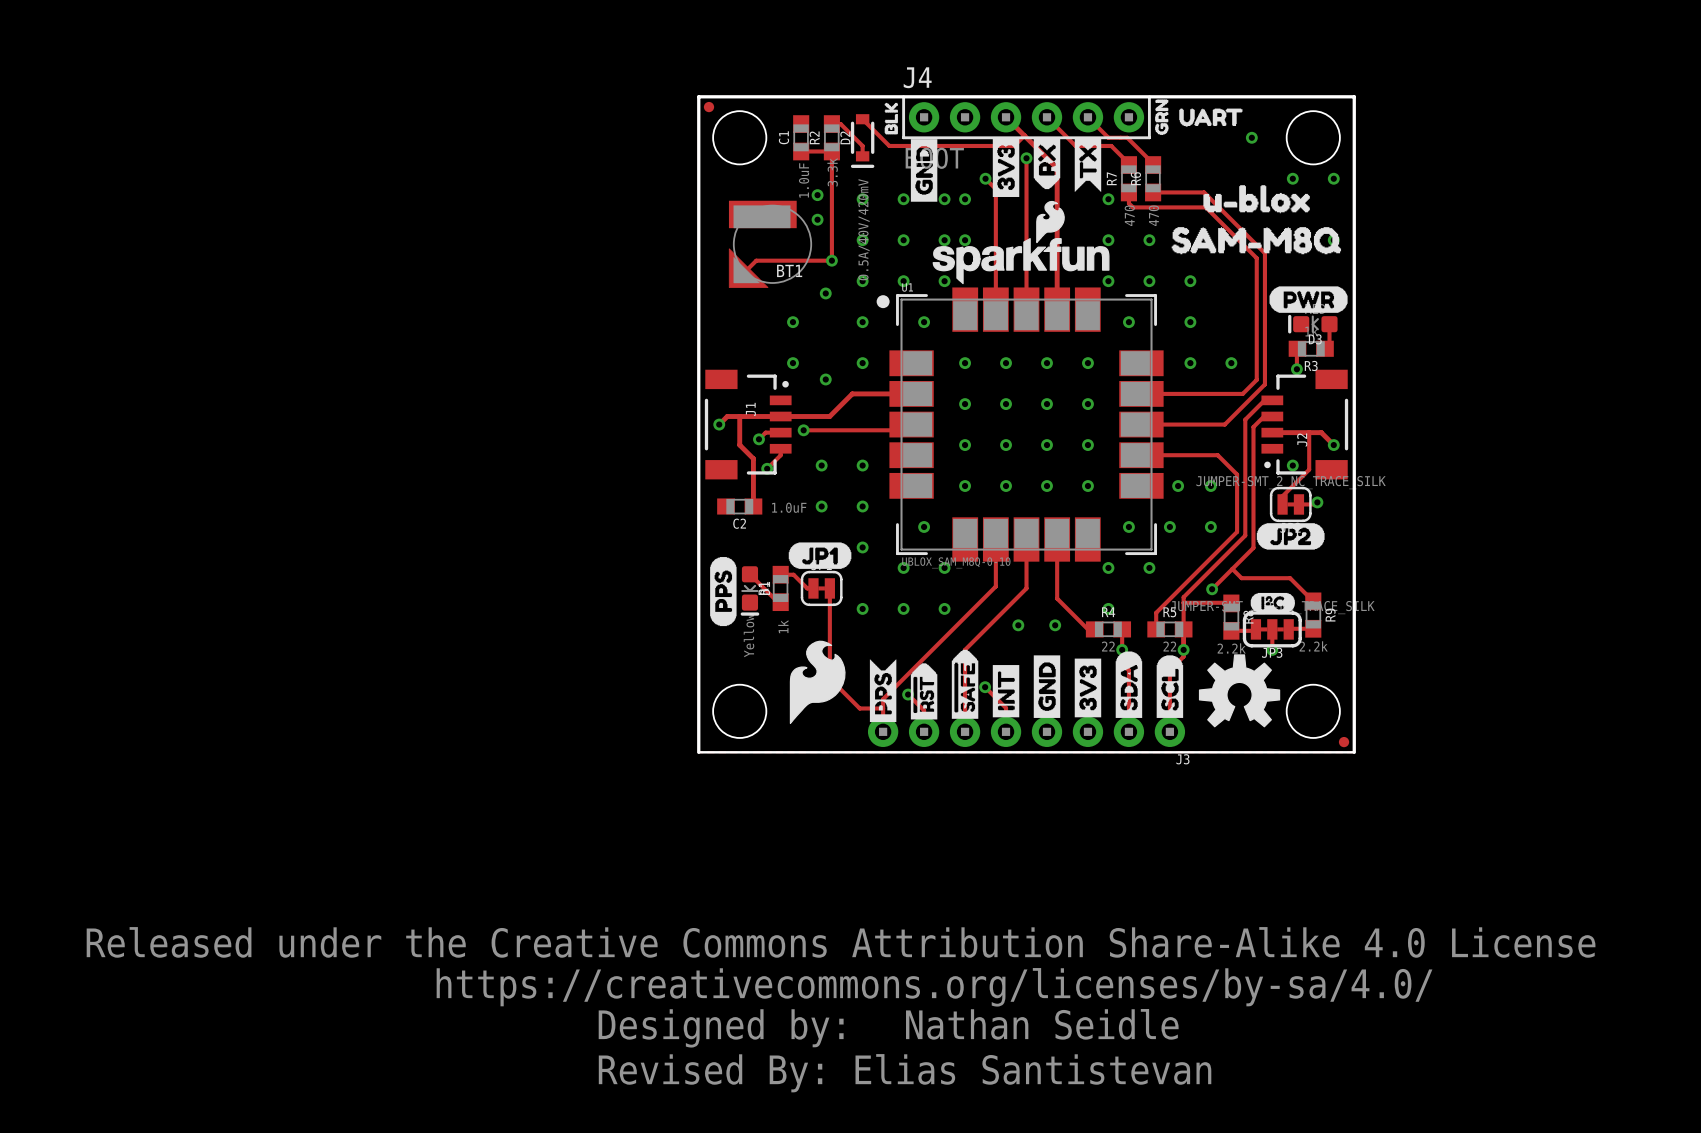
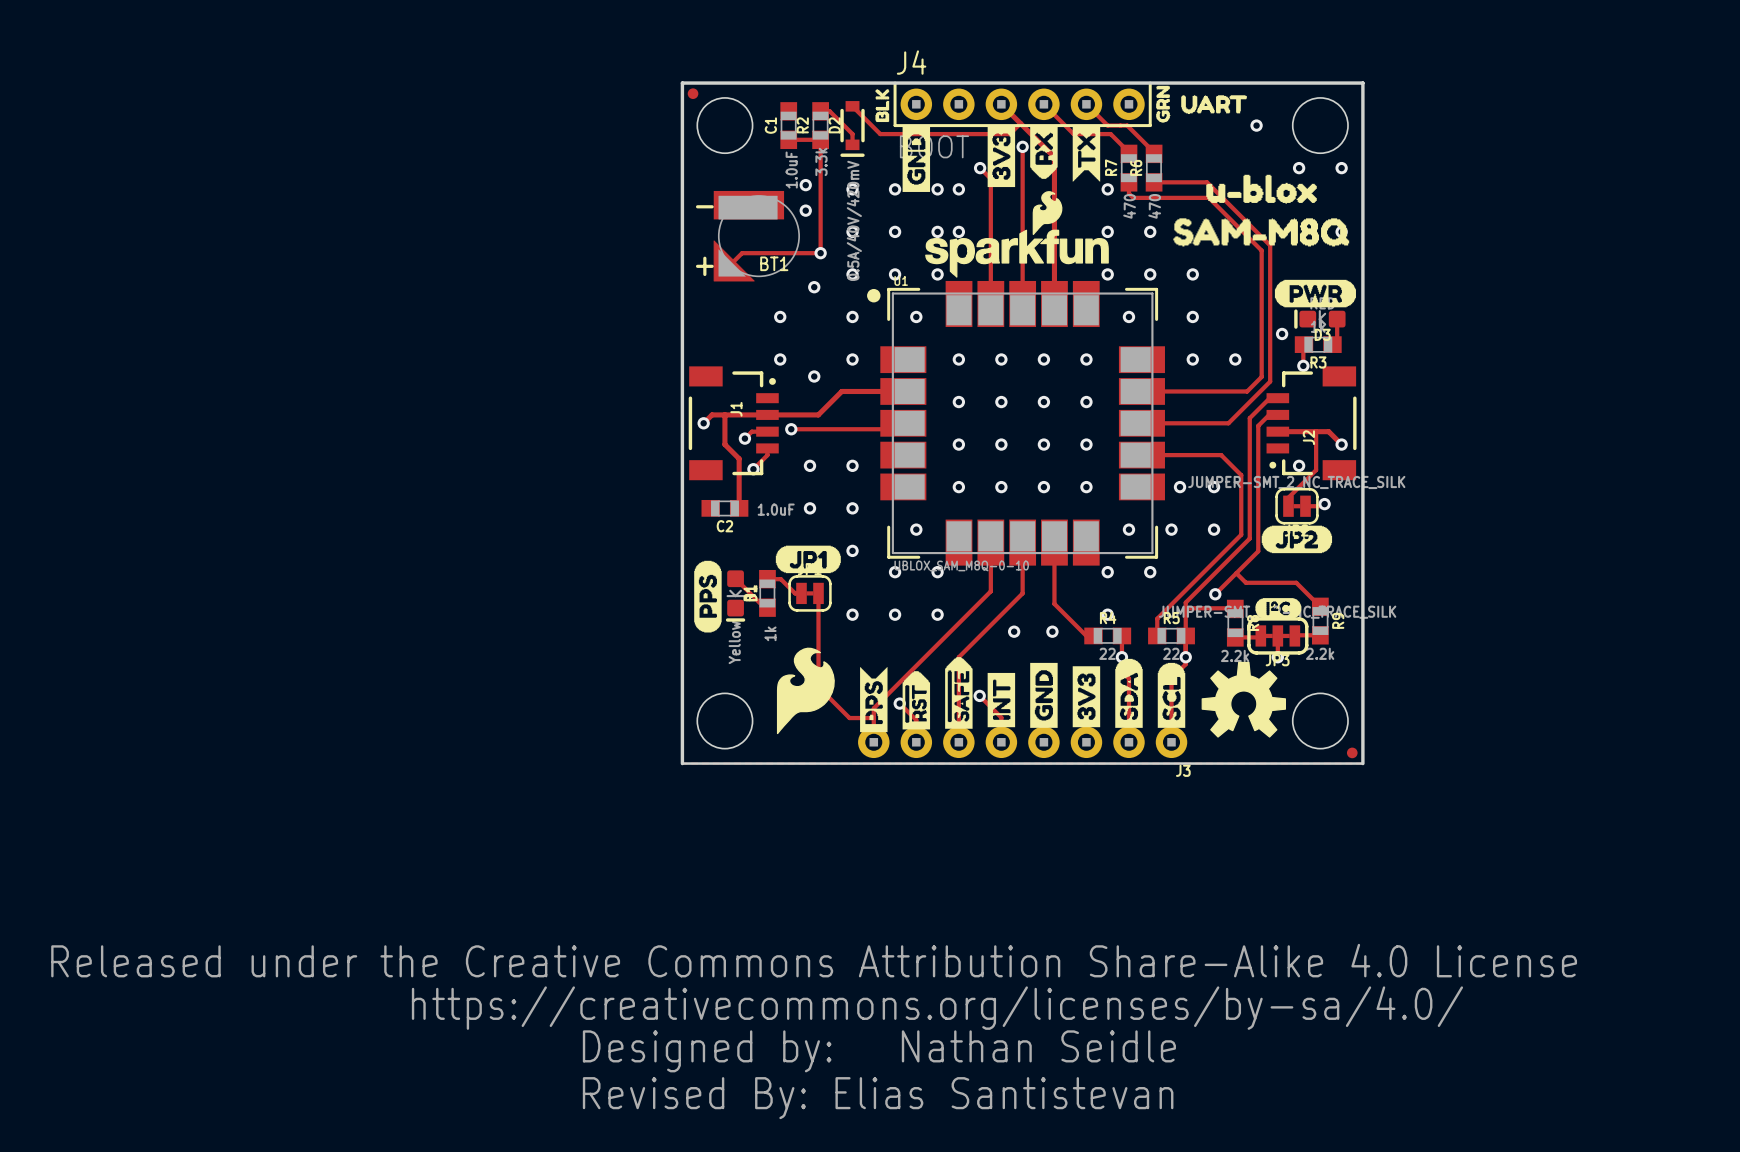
text: none -> - (704, 206)
text: none -> + (704, 266)
via: none -> (1282, 333)

